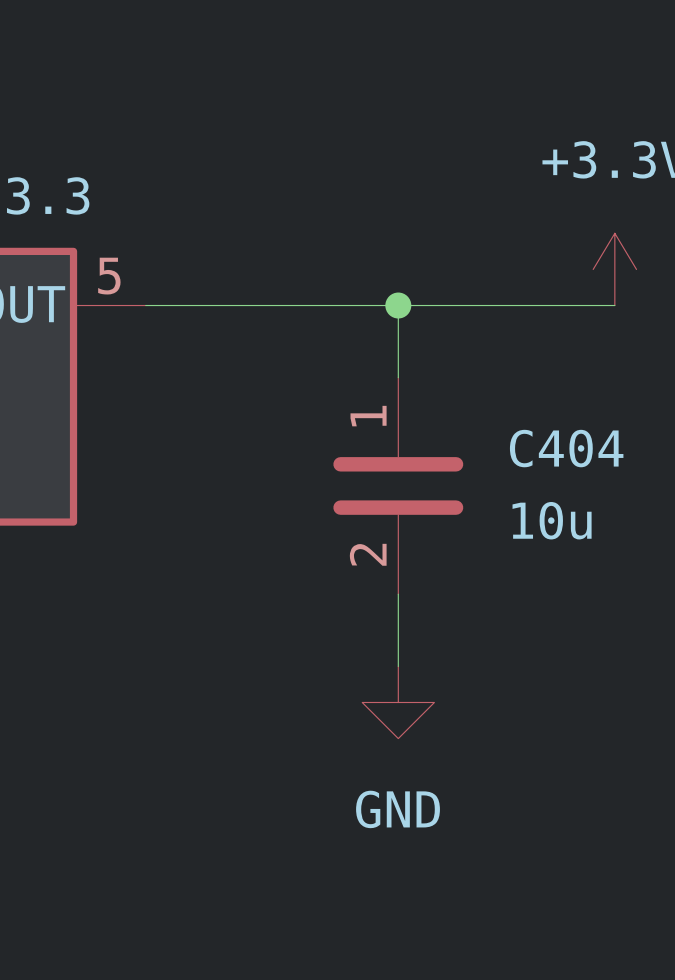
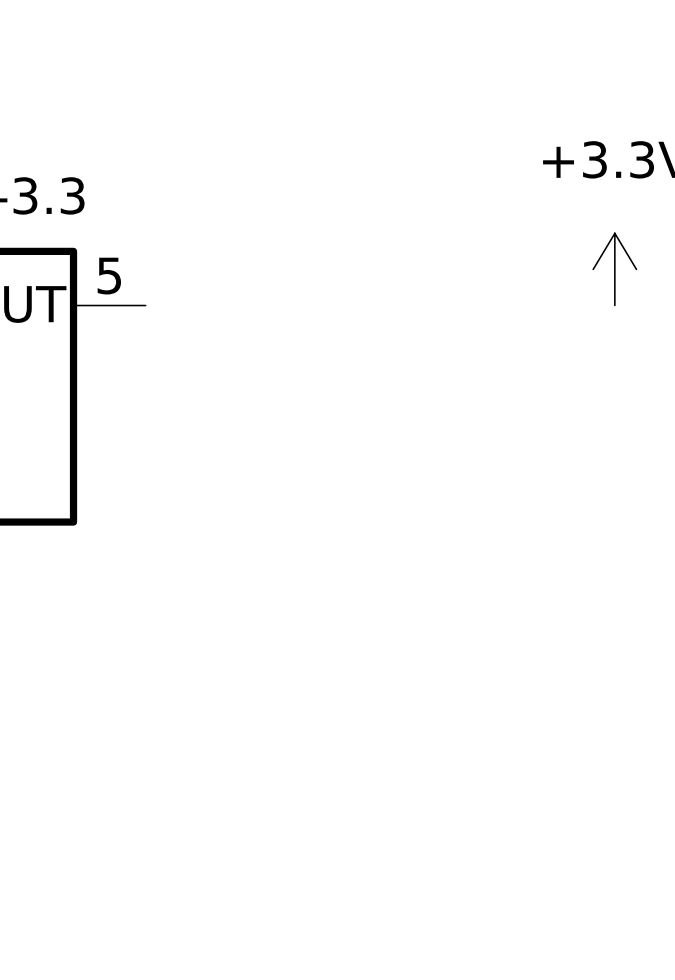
wire: (145, 305) (614, 305) -> none
wire: (398, 305) (398, 377) -> none
junction: (398, 305) -> none
C404: 10u (398, 485) -> none
wire: (398, 594) (398, 666) -> none
power symbol: GND (398, 702) -> none

